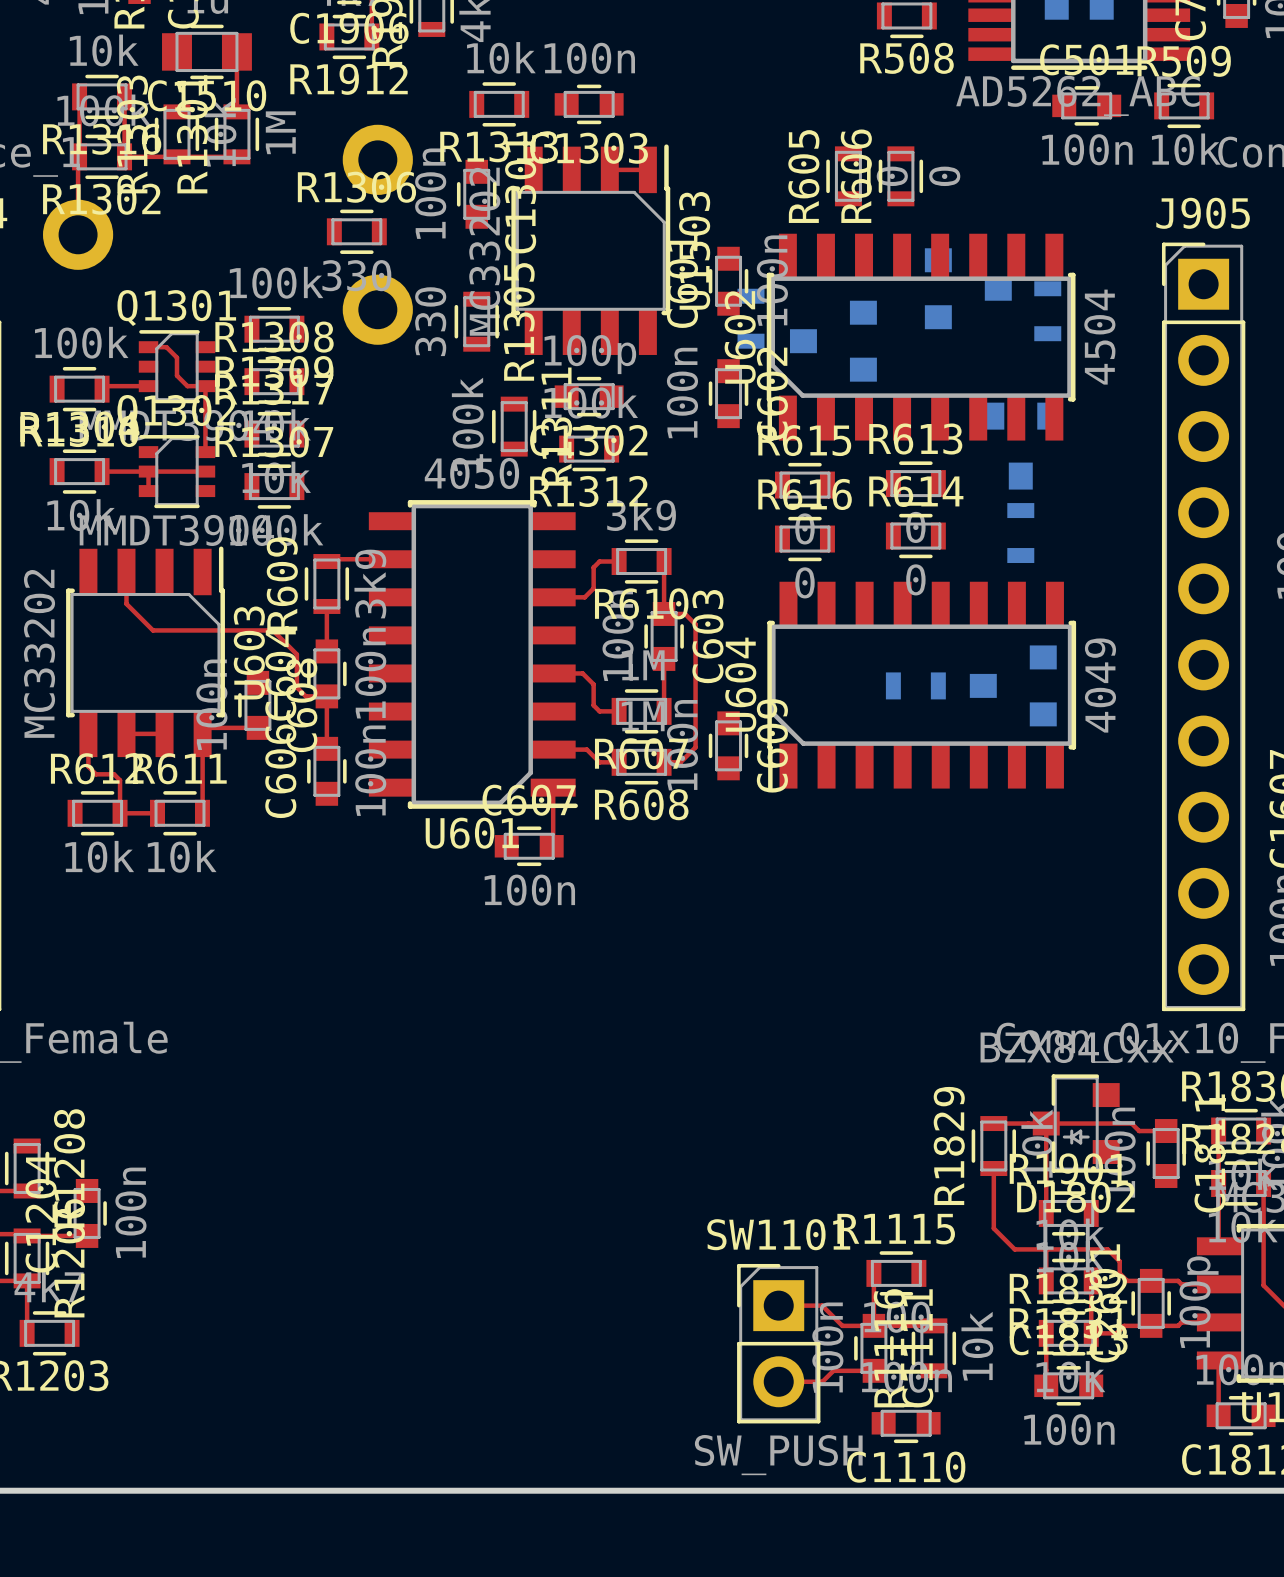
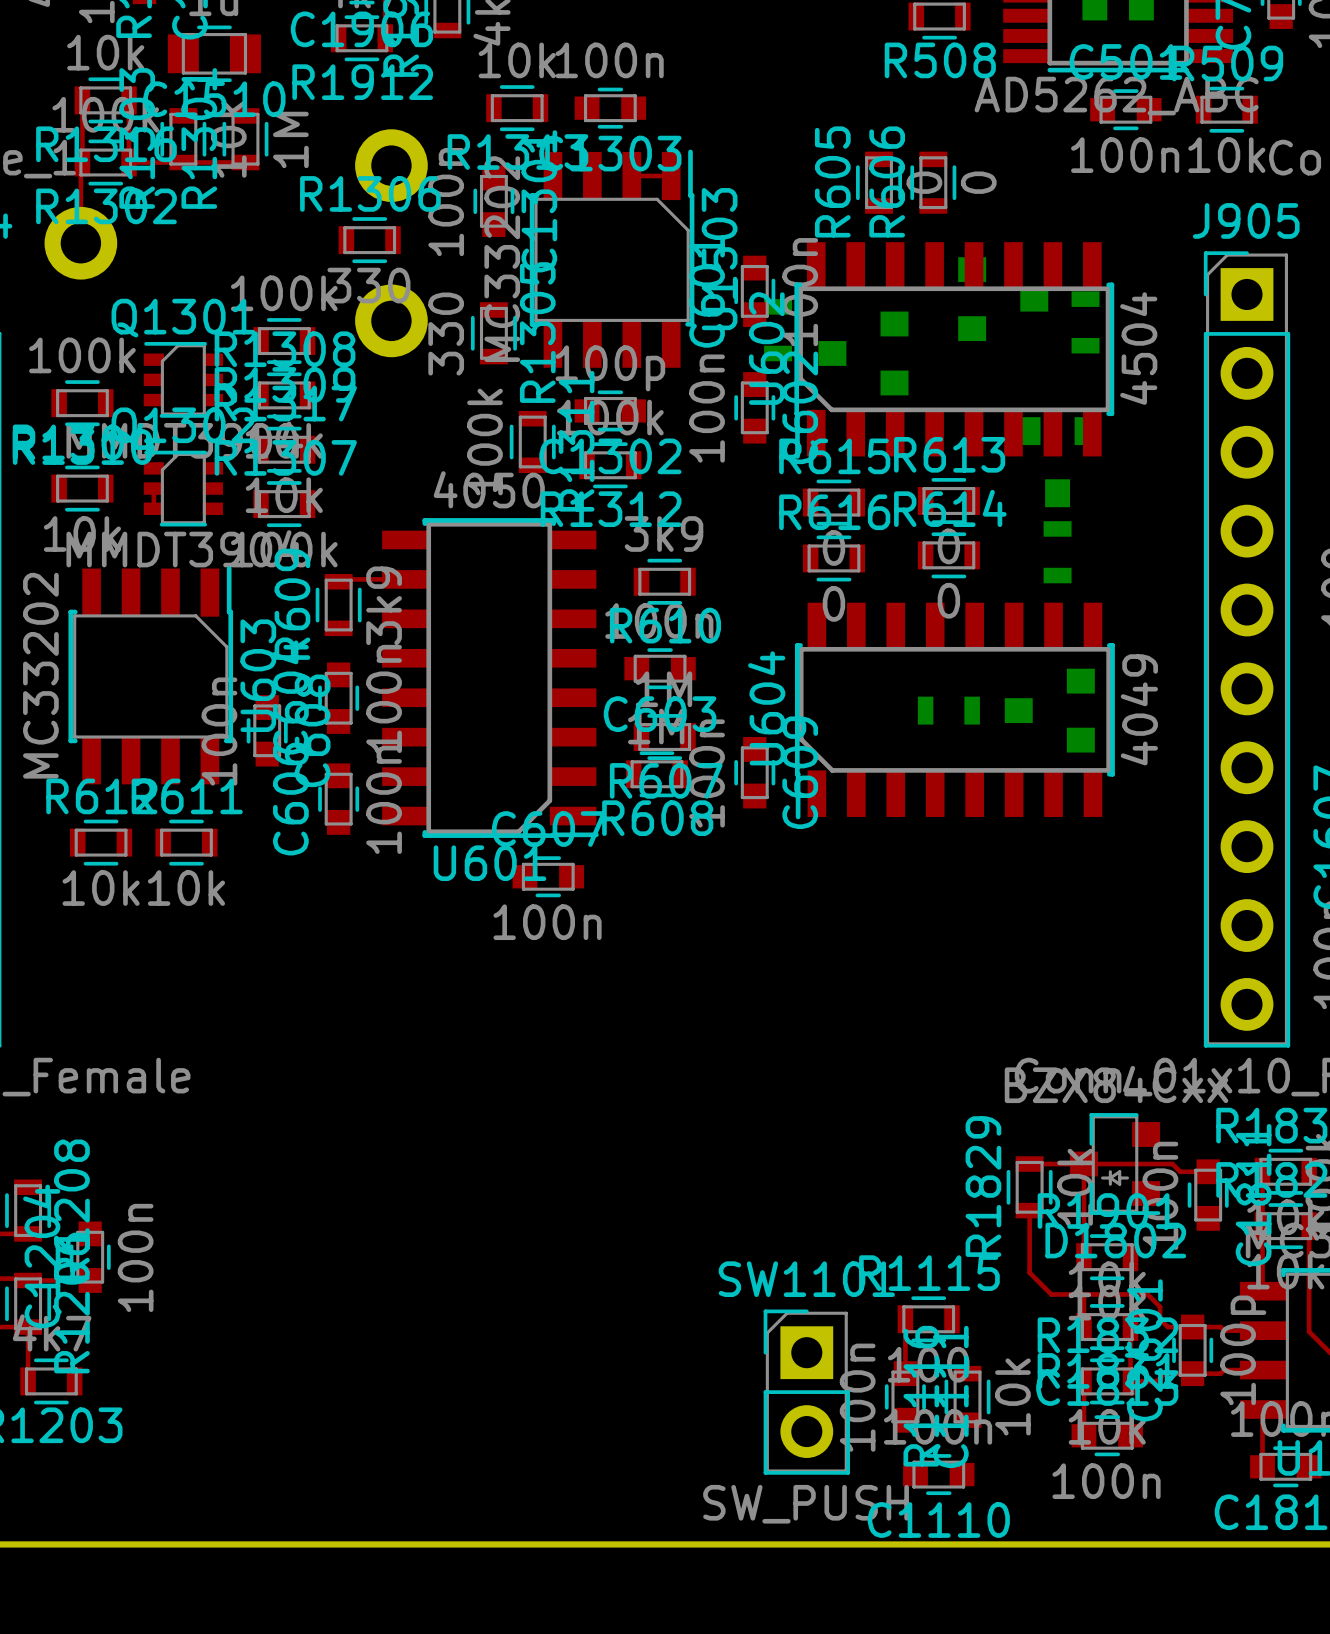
top track: (236, 51) (236, 111) -> none
top track: (148, 347) (166, 347) (176, 357) (176, 375) (187, 386) (205, 386) (205, 452) -> none
top track: (148, 386) (105, 386) (102, 389) -> none
top track: (102, 471) (205, 471) -> none
top track: (619, 561) (599, 561) (593, 567) (593, 588) (584, 597) (553, 597) -> none
top track: (664, 561) (664, 613) (685, 613) (695, 624) (695, 747) (680, 762) (664, 762) -> none
top track: (126, 572) (126, 603) (153, 630) (272, 630) (296, 654) (296, 687) (305, 696) (326, 696) (326, 748) -> none
top track: (326, 606) (326, 651) -> none
C603 rotation: 0° (664, 636) -> 90° clockwise (660, 668)
top track: (664, 658) (664, 711) -> none
top track: (553, 673) (582, 673) (593, 684) (593, 705) (599, 711) (619, 711) -> none
top track: (257, 727) (208, 727) (202, 733) (202, 813) -> none
top track: (88, 733) (88, 766) (96, 774) (114, 774) (120, 780) (120, 813) (157, 813) -> none
top track: (126, 733) (164, 733) -> none
top track: (553, 749) (586, 749) (599, 762) (619, 762) (616, 764) -> none
R608 position: (641, 762) -> (656, 774)
top track: (553, 787) (551, 846) -> none
top track: (778, 1305) (822, 1305) (842, 1325) (933, 1325) -> none
top track: (873, 1370) (833, 1370) (822, 1381) (778, 1381) -> none

